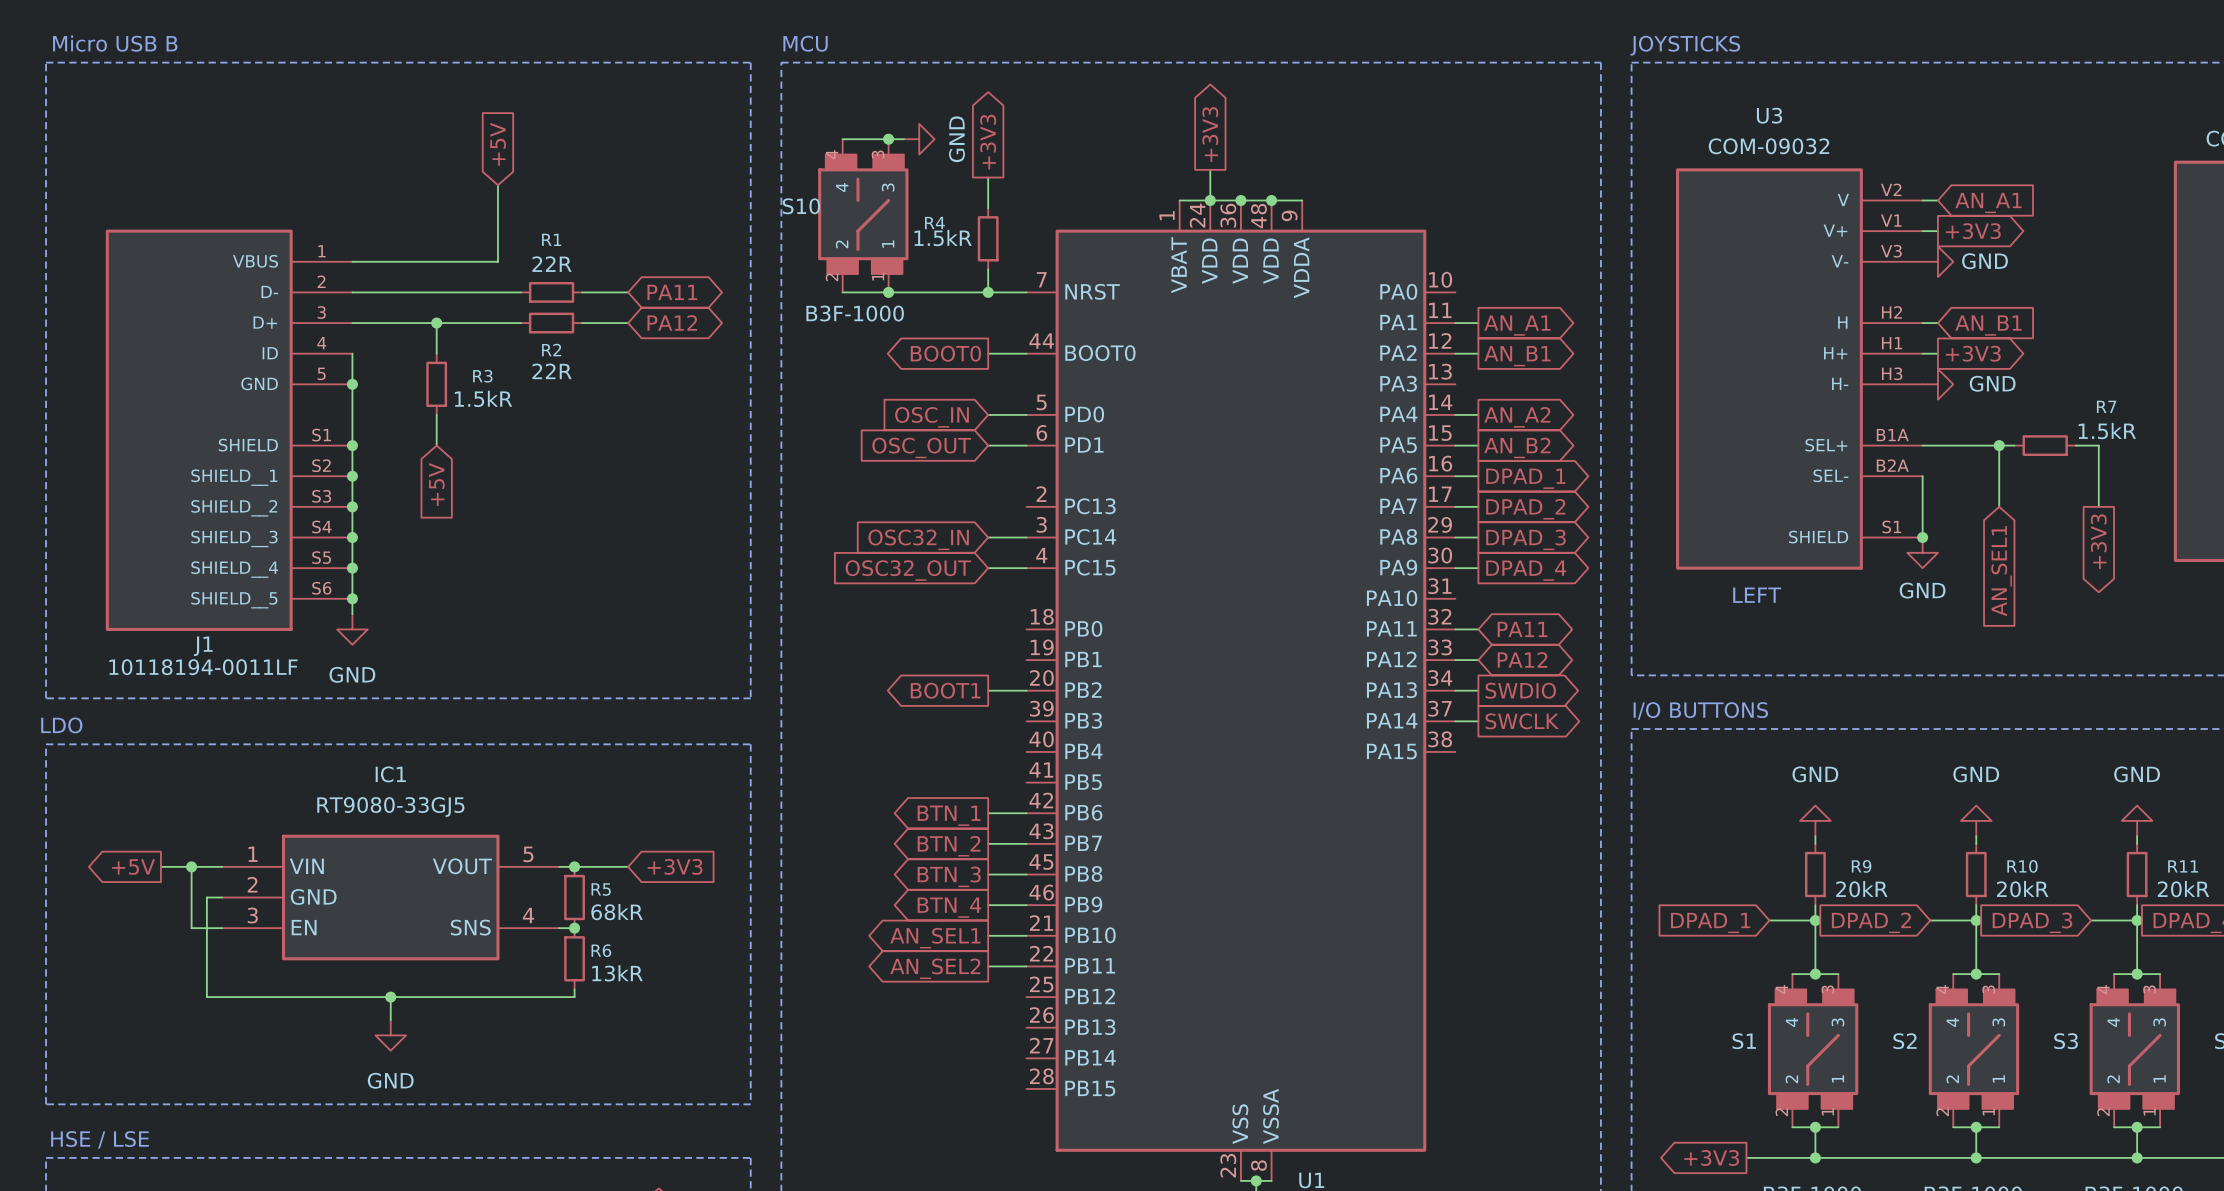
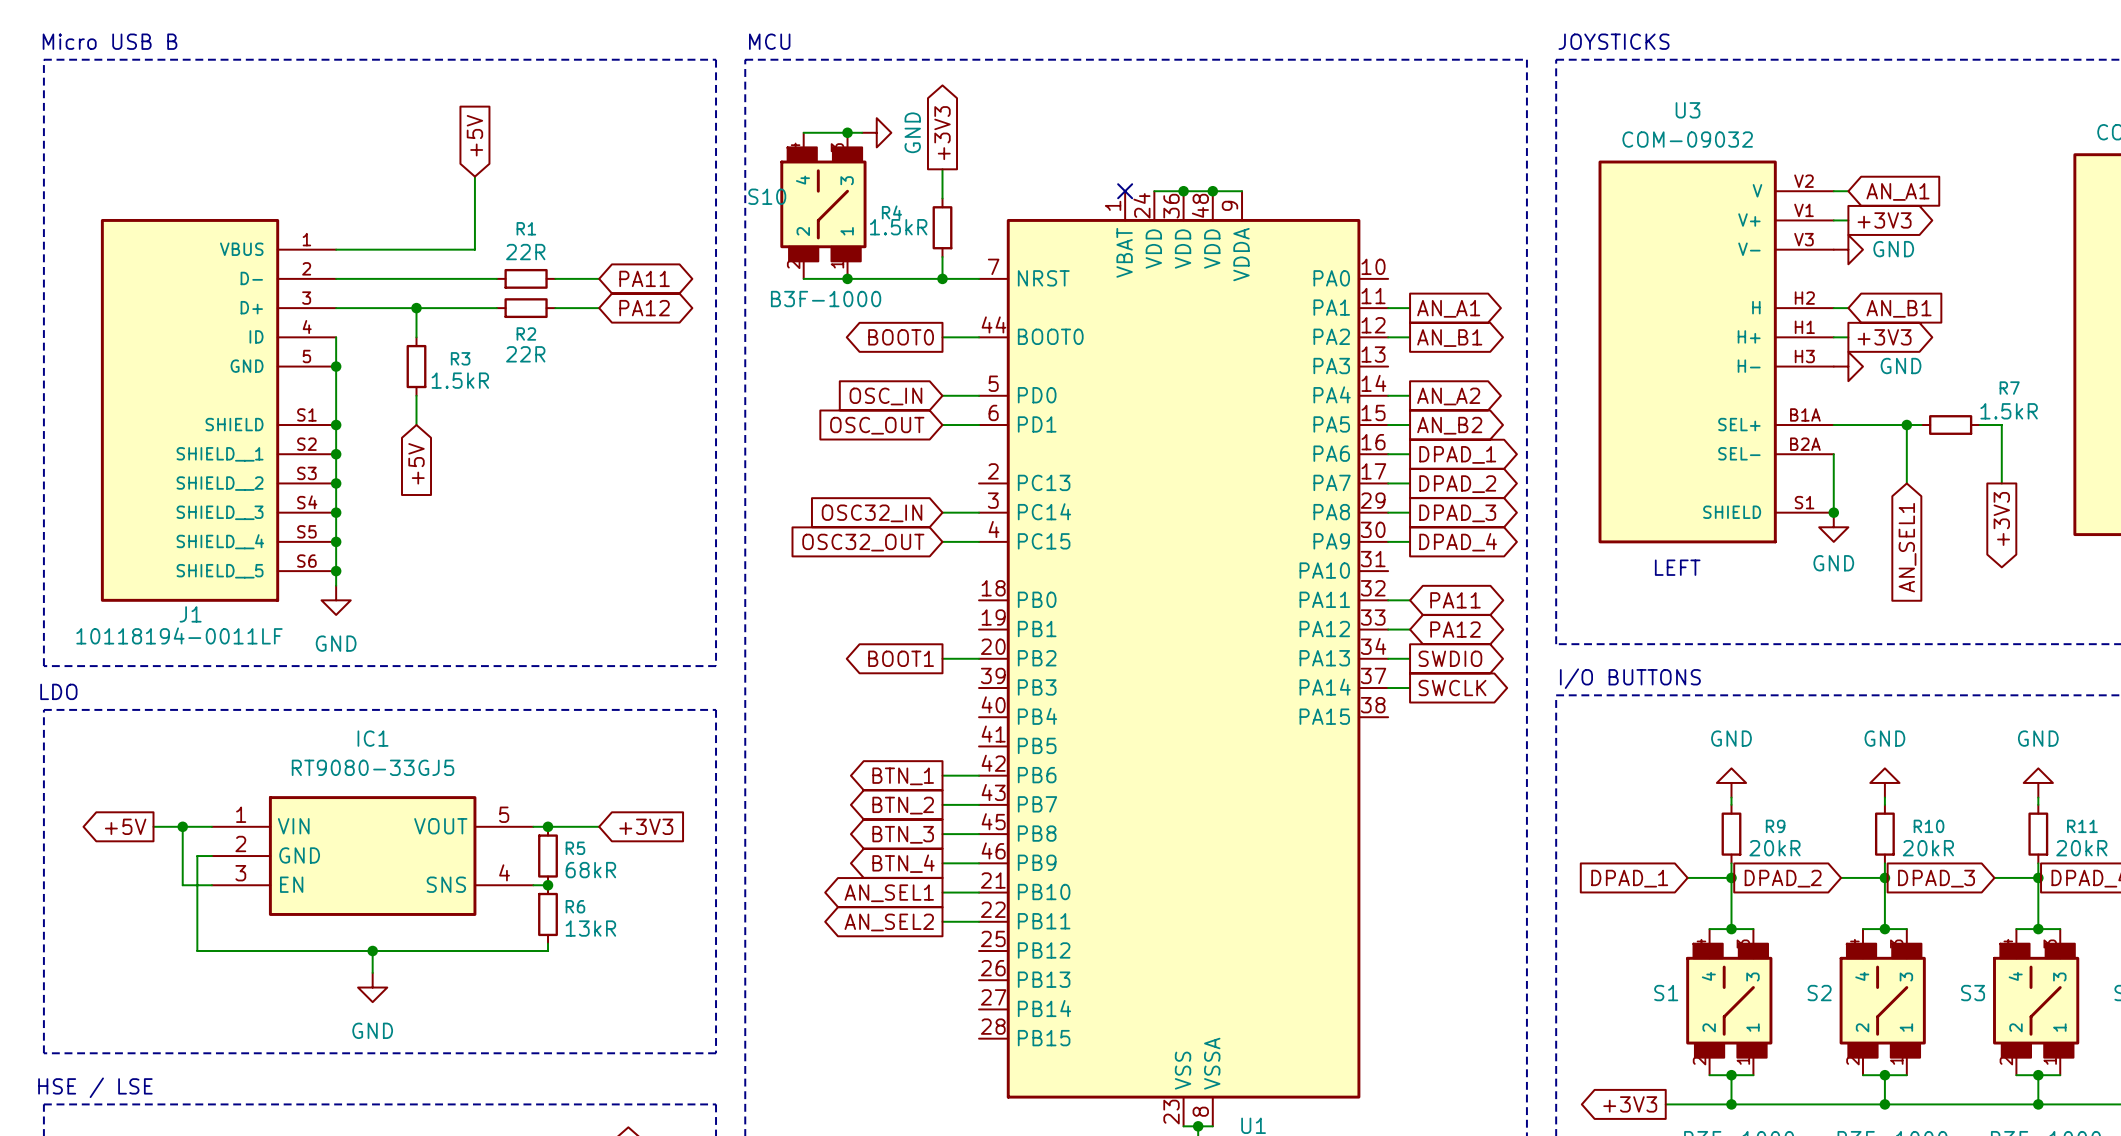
global label: +3V3 (1210, 134) -> none
wire: (1210, 169) (1210, 200) (1179, 200) -> none
no-connect mark: none -> (1125, 191)
junction: (1210, 200) -> none

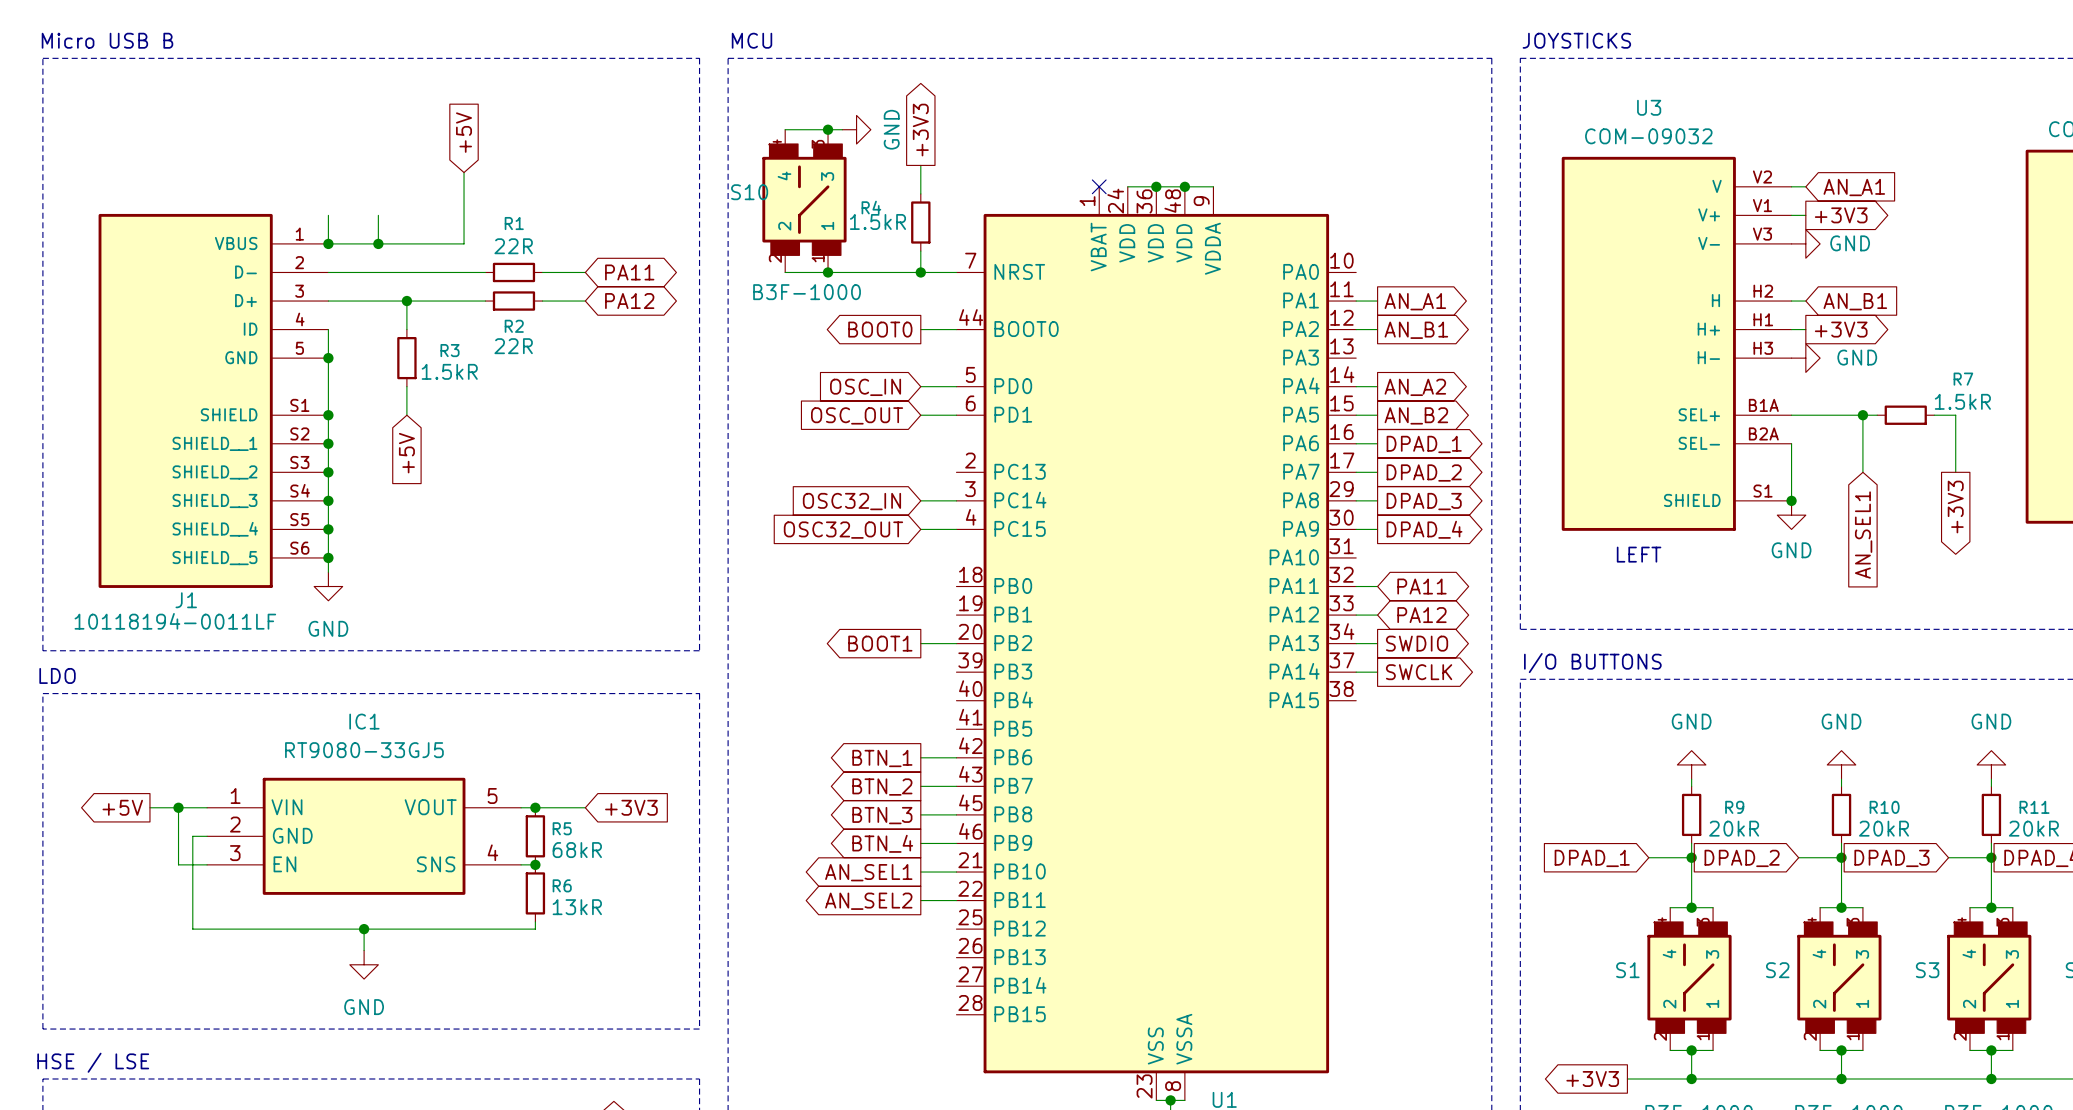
wire: none -> (328, 215) (328, 243)
wire: none -> (378, 215) (378, 243)
junction: none -> (328, 243)
junction: none -> (378, 243)

